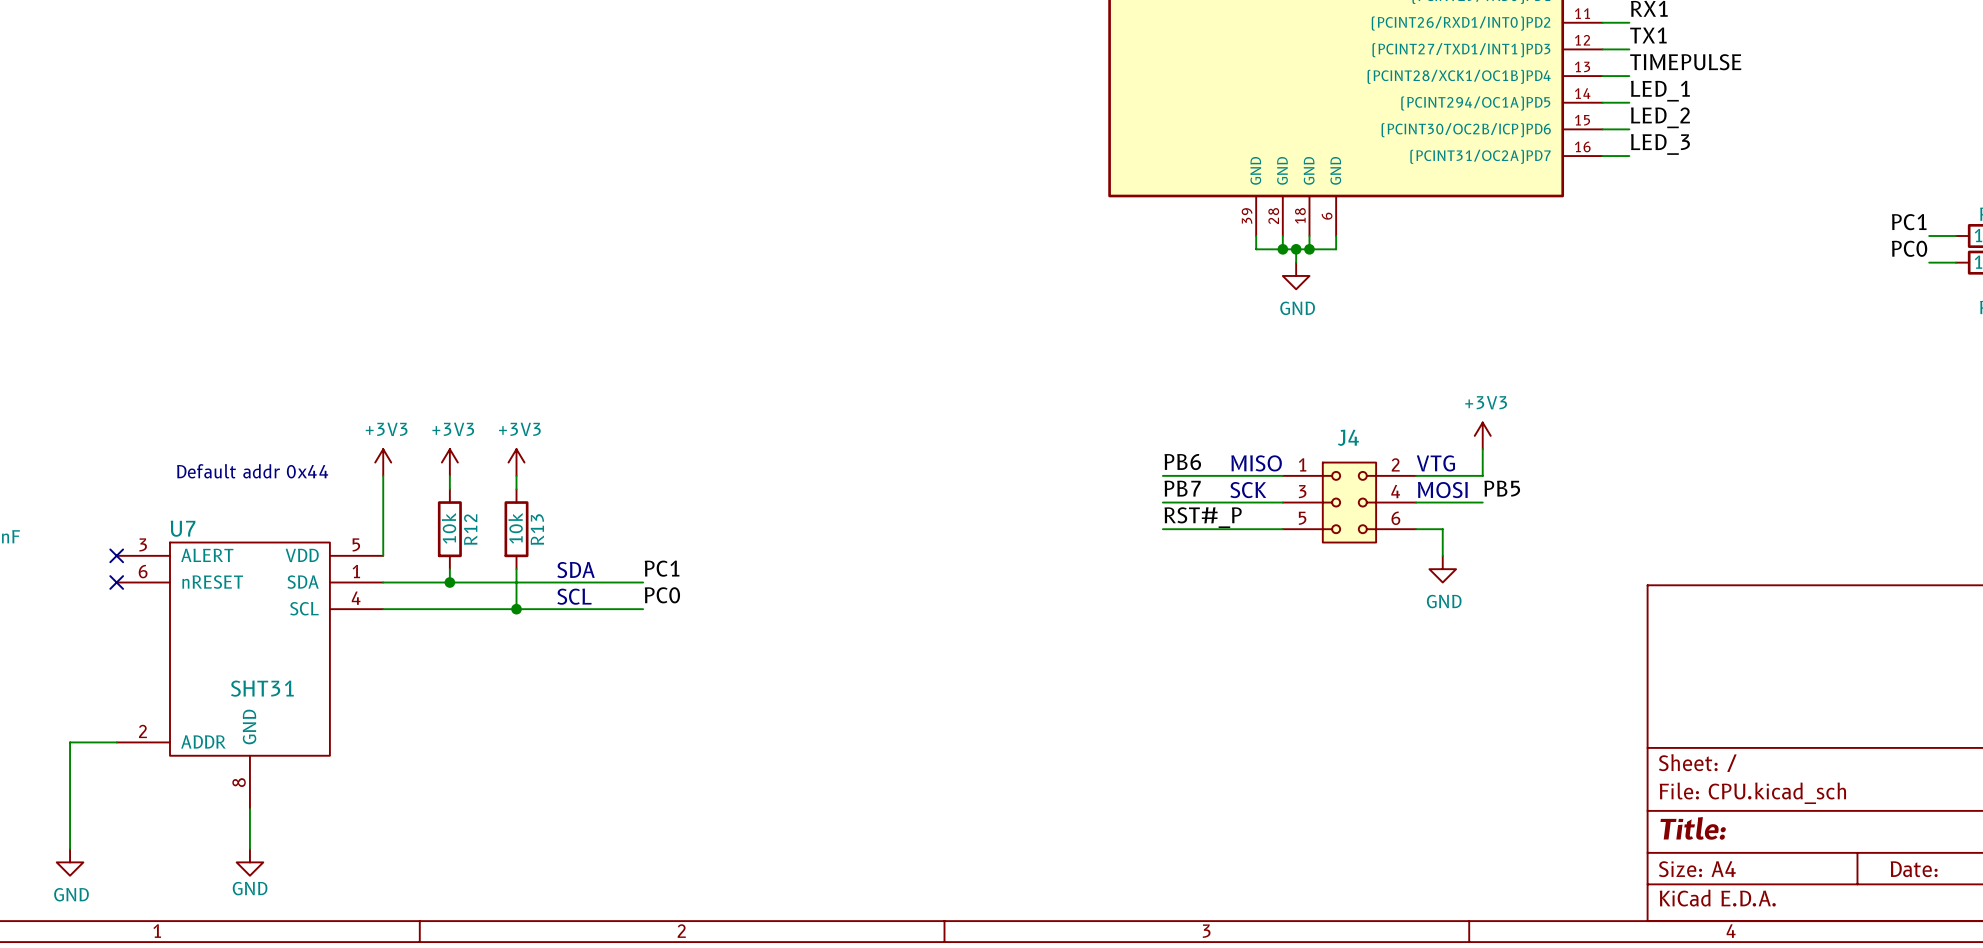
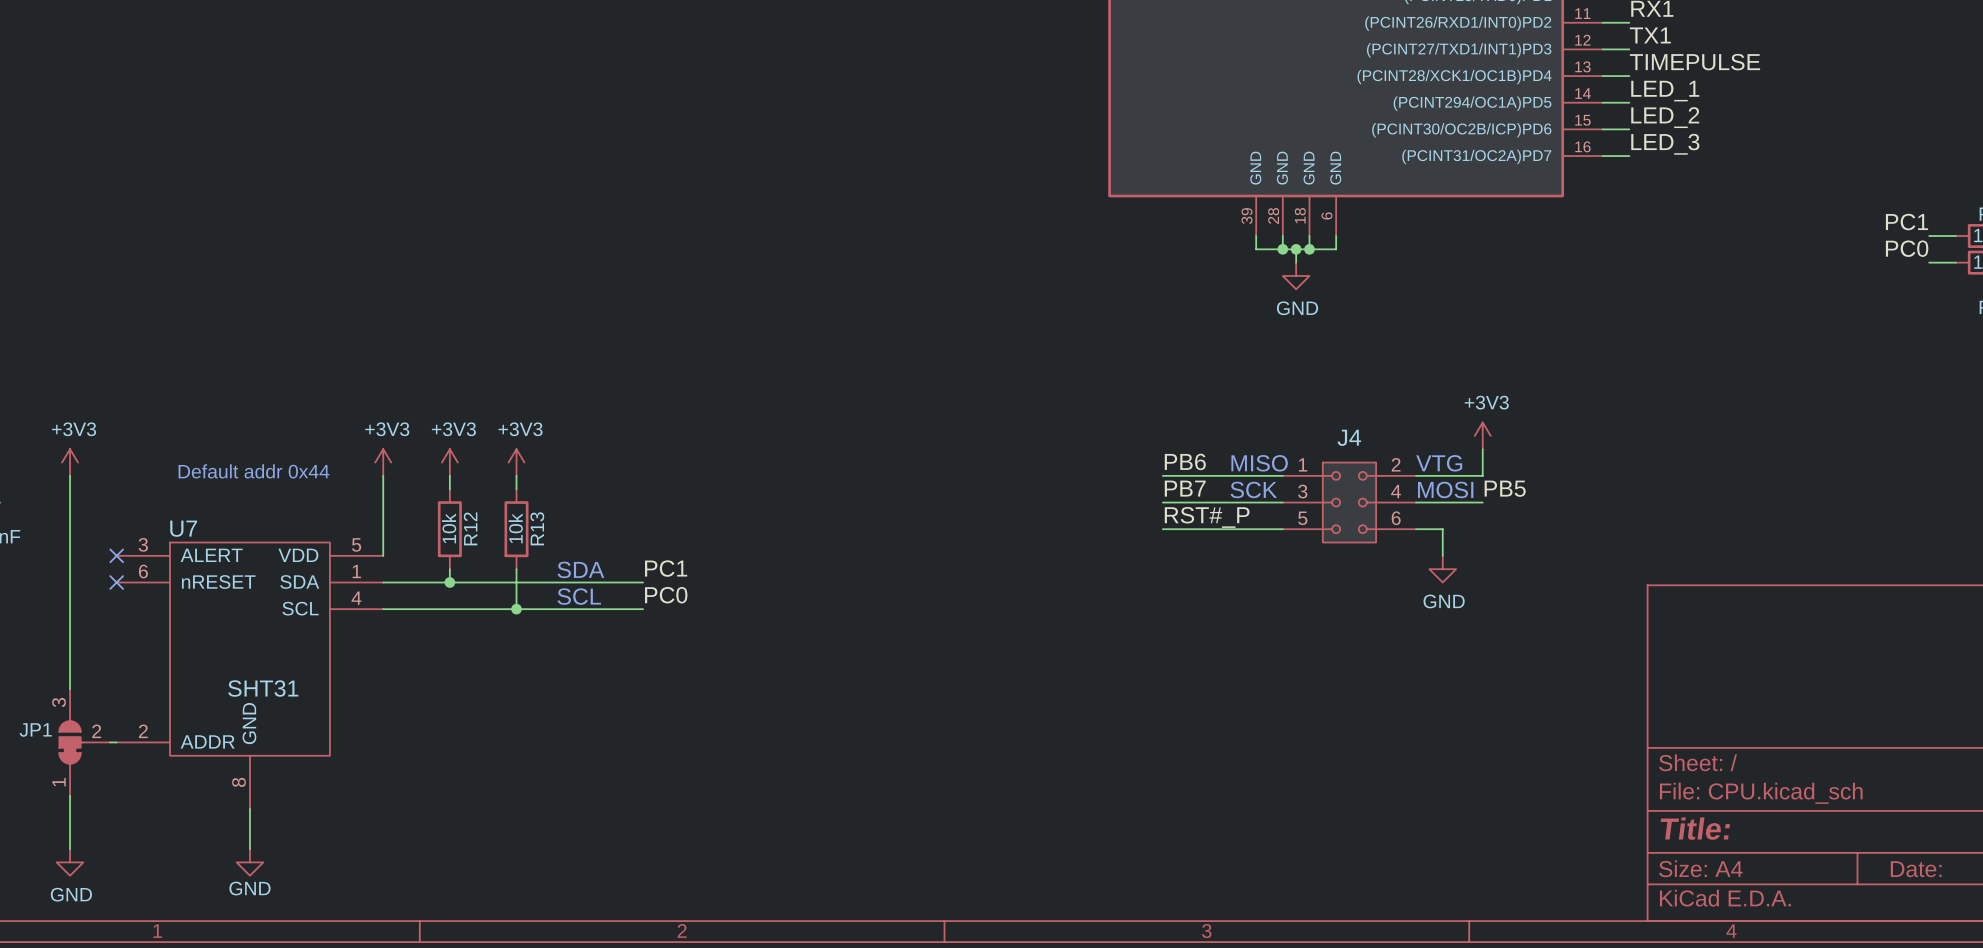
power symbol: none -> +3V3 (70, 462)
wire: none -> (70, 475) (70, 689)
JP1: none -> (84, 742)

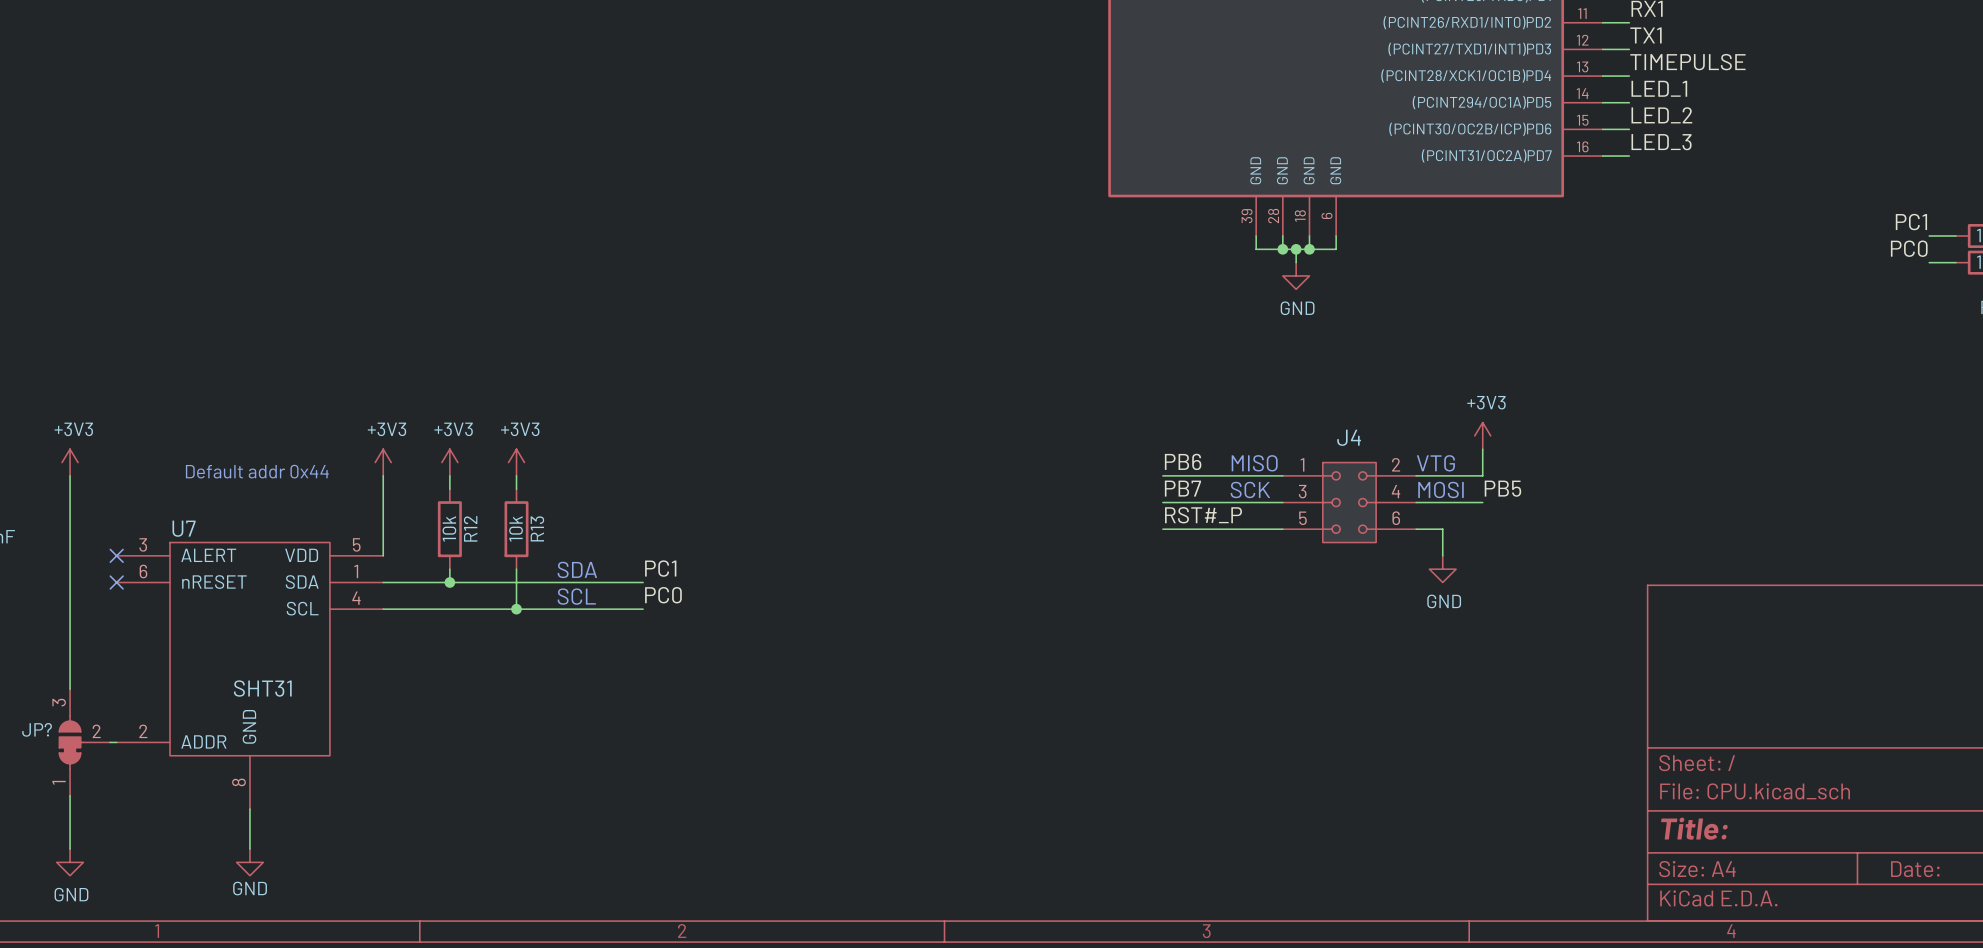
JP1 name: JP1 (35, 729) -> JP? (37, 729)

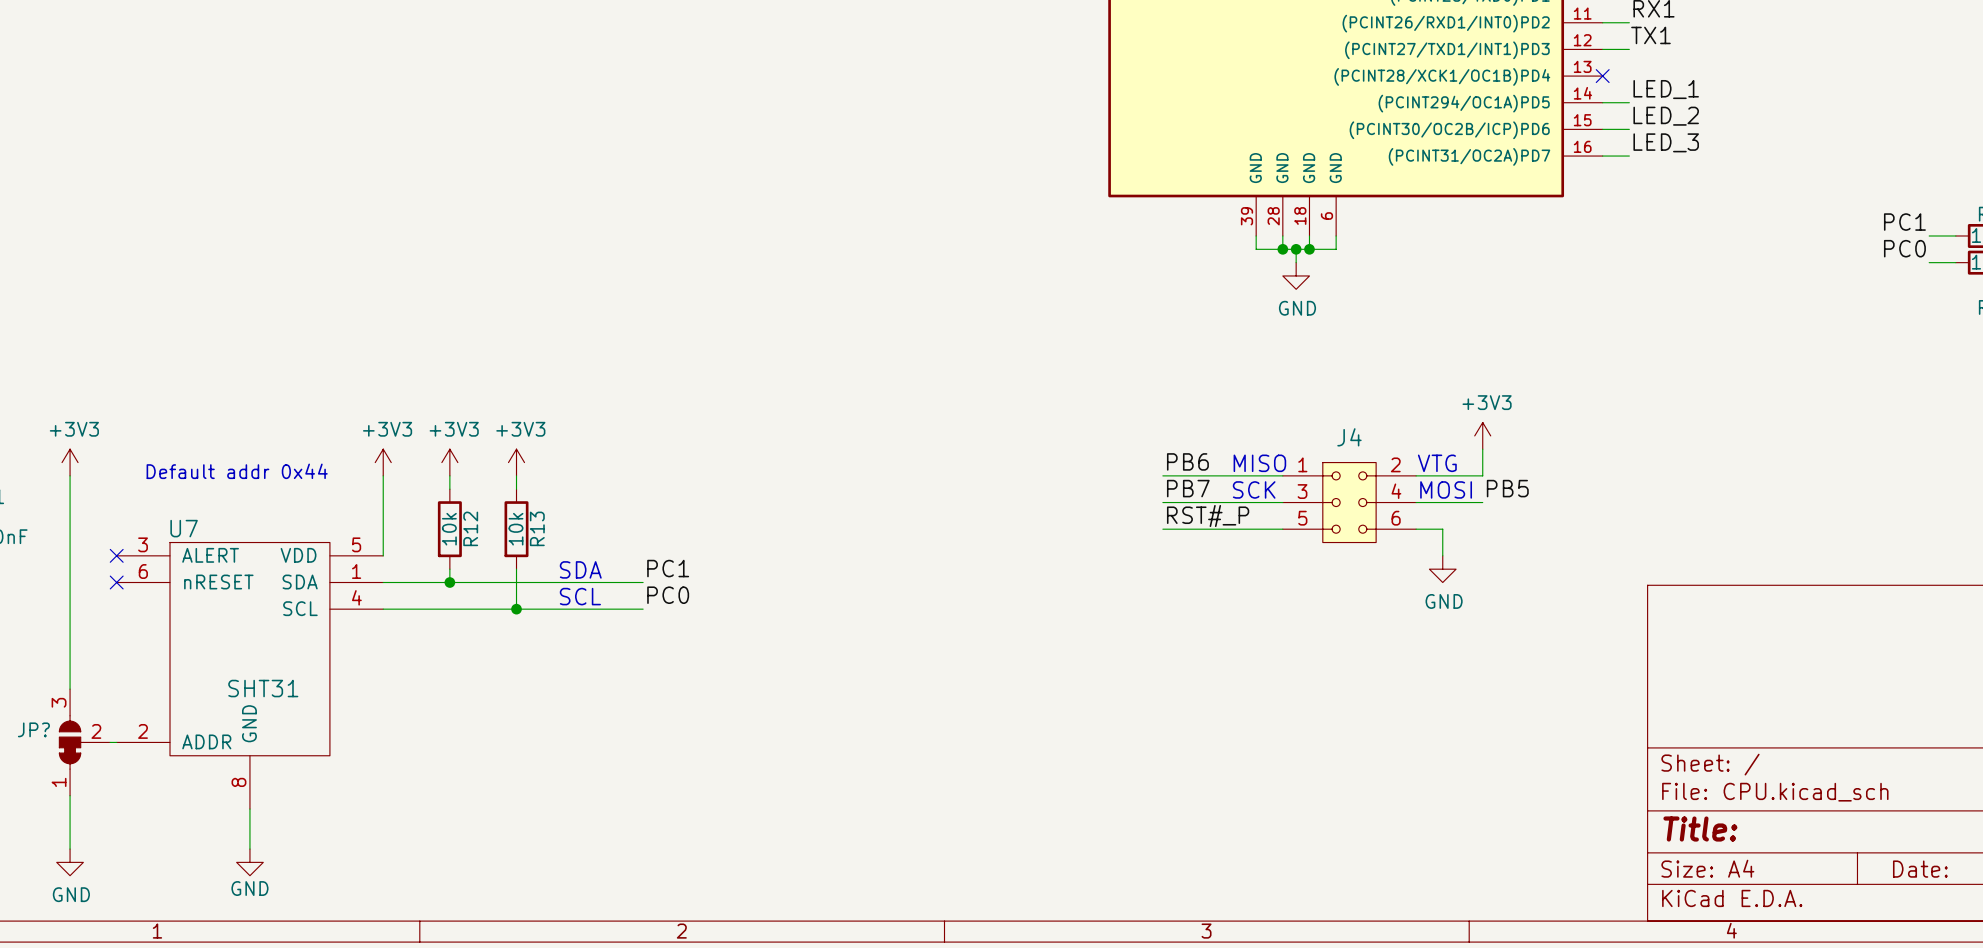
label: TIMEPULSE (1687, 62) -> none
wire: (1602, 76) (1629, 76) -> none
no-connect mark: none -> (1602, 76)

